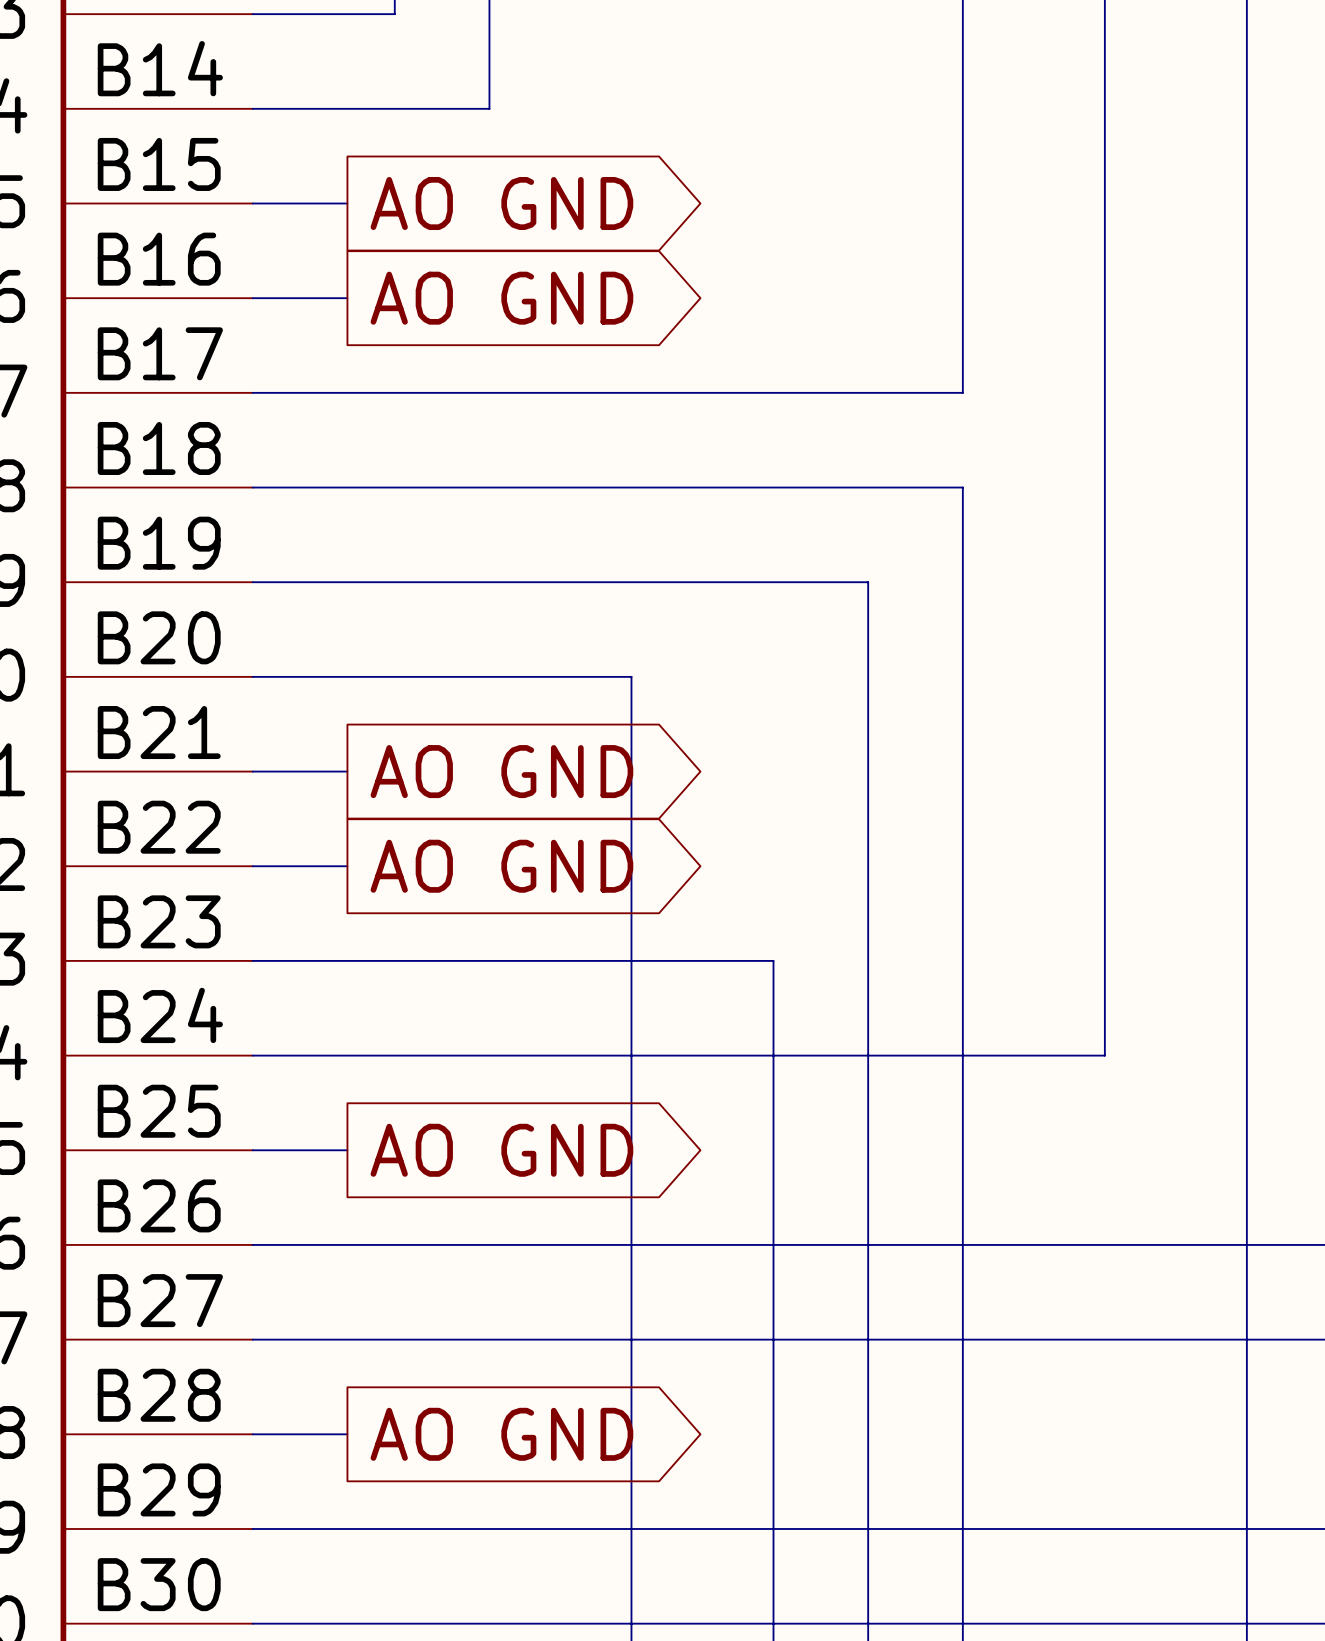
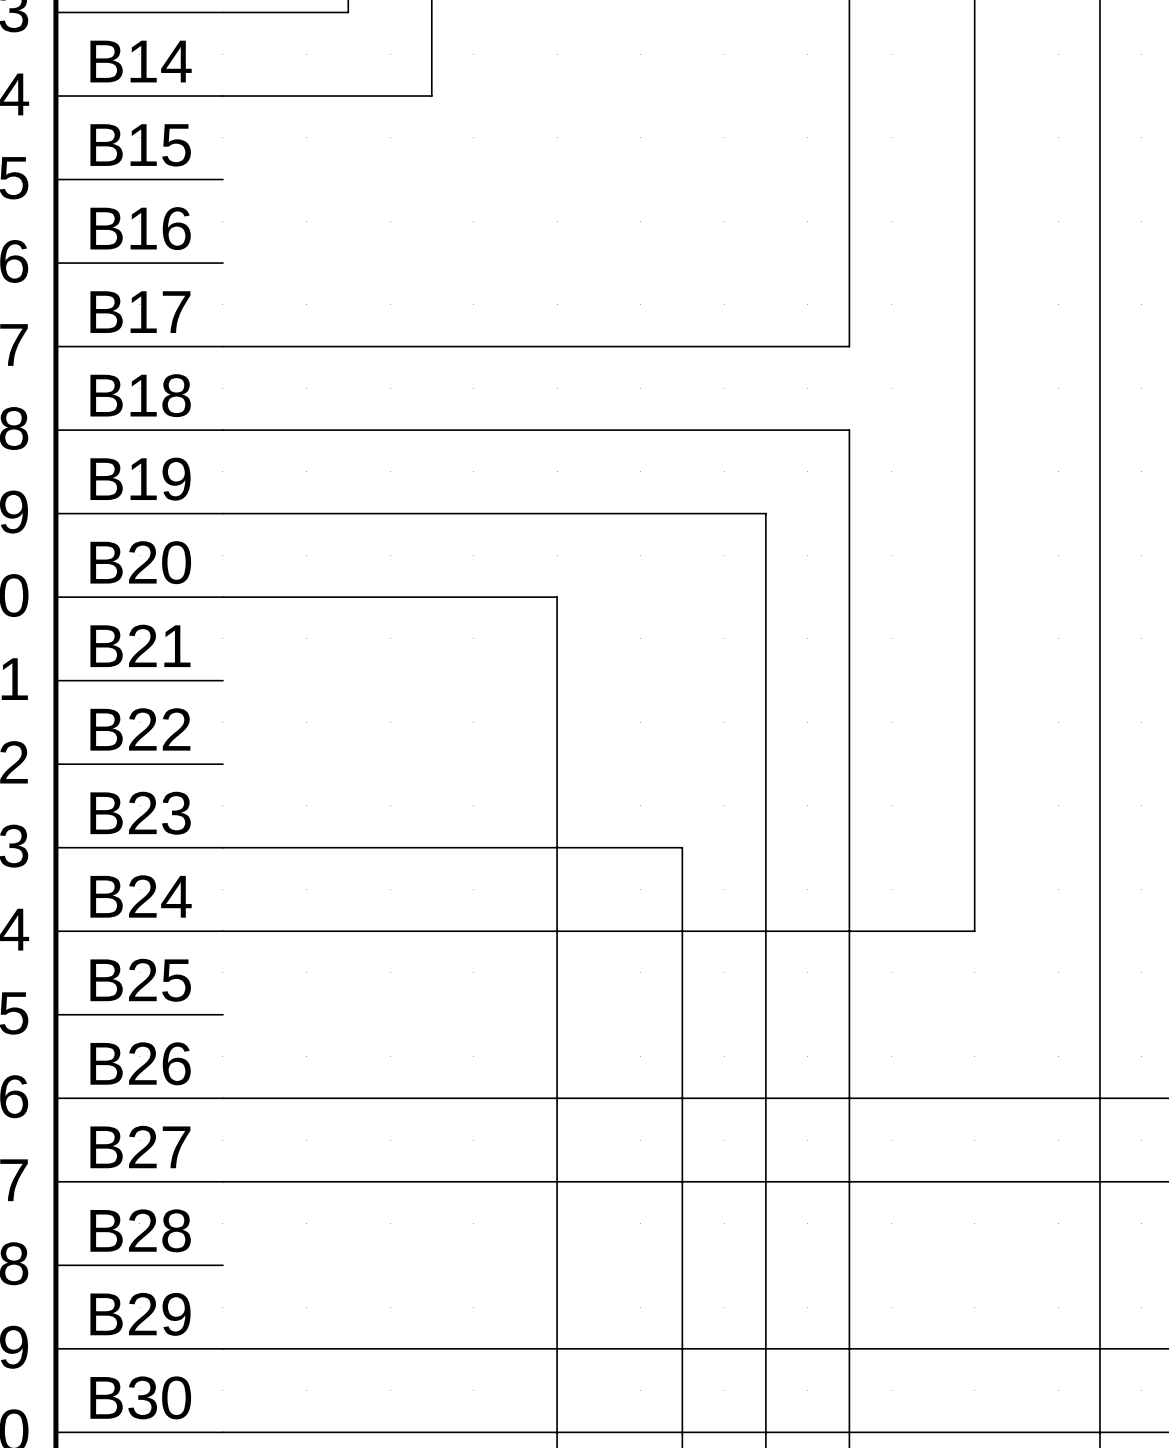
wire: (252, 203) (347, 203) -> none
global label: AO GND (501, 203) -> none
wire: (252, 298) (347, 298) -> none
global label: AO GND (501, 298) -> none
wire: (252, 771) (347, 771) -> none
global label: AO GND (501, 771) -> none
wire: (252, 866) (347, 866) -> none
global label: AO GND (501, 866) -> none
wire: (252, 1150) (347, 1150) -> none
global label: AO GND (501, 1150) -> none
wire: (252, 1434) (347, 1434) -> none
global label: AO GND (501, 1434) -> none

